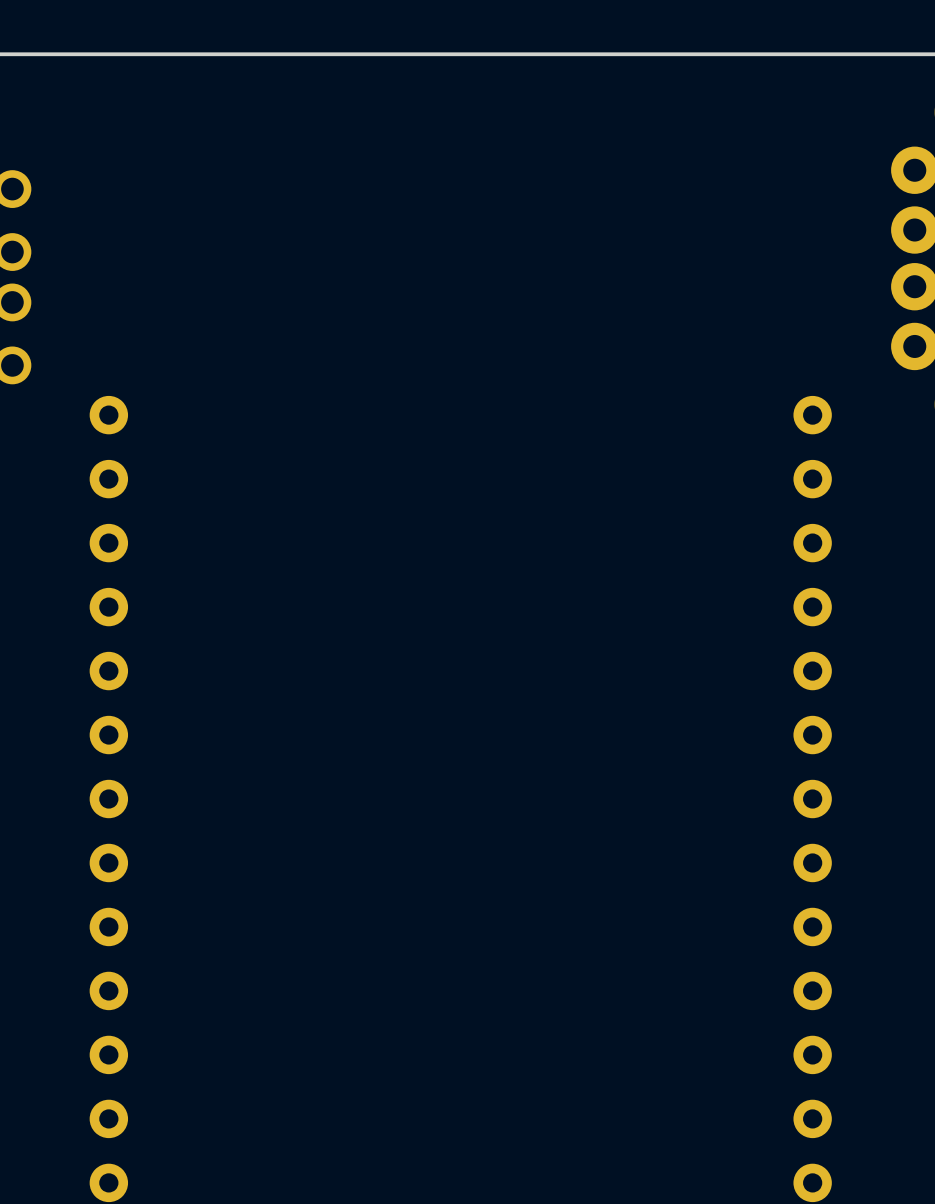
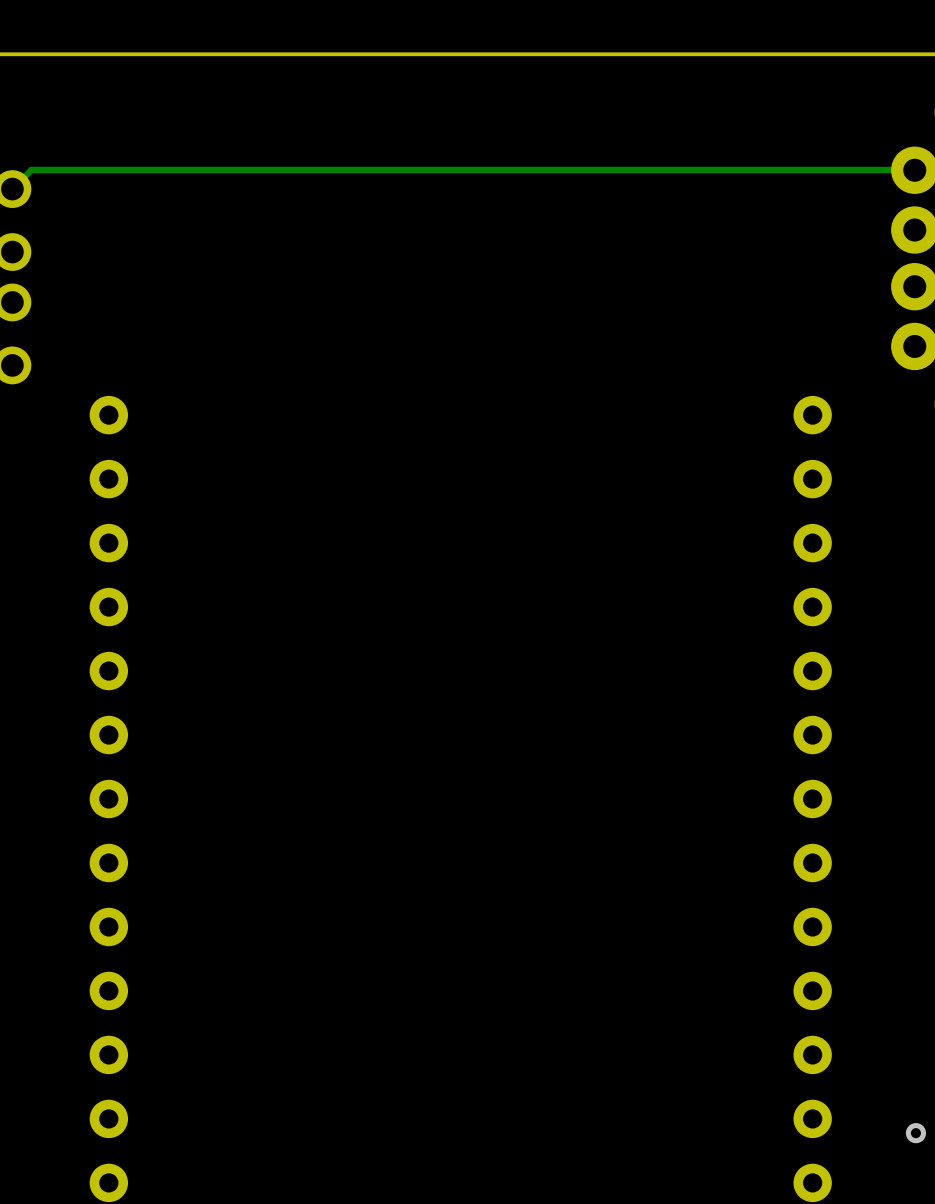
track: none -> (905, 169) (31, 169) (12, 189)
via: none -> (915, 1133)

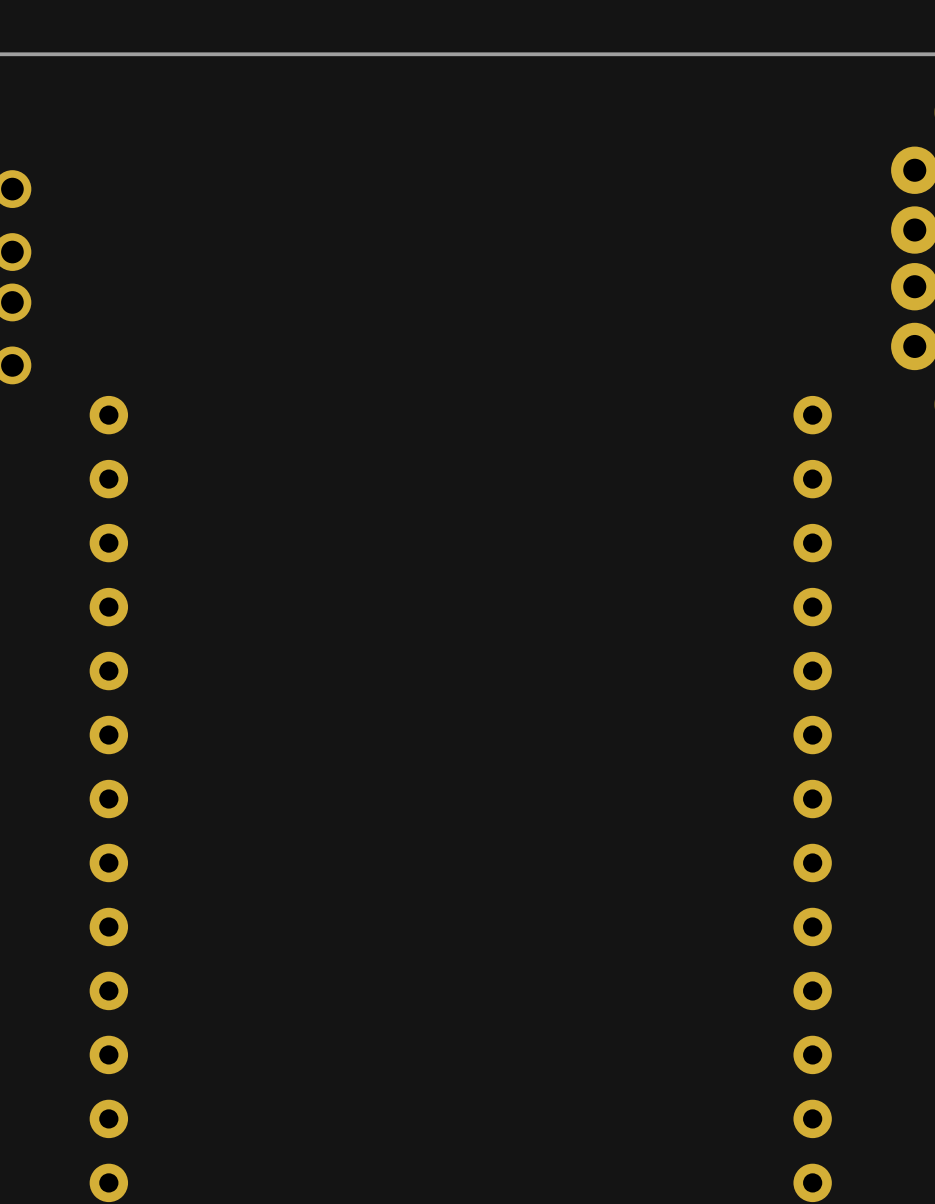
track: (905, 169) (31, 169) (12, 189) -> none
via: (915, 1133) -> none

